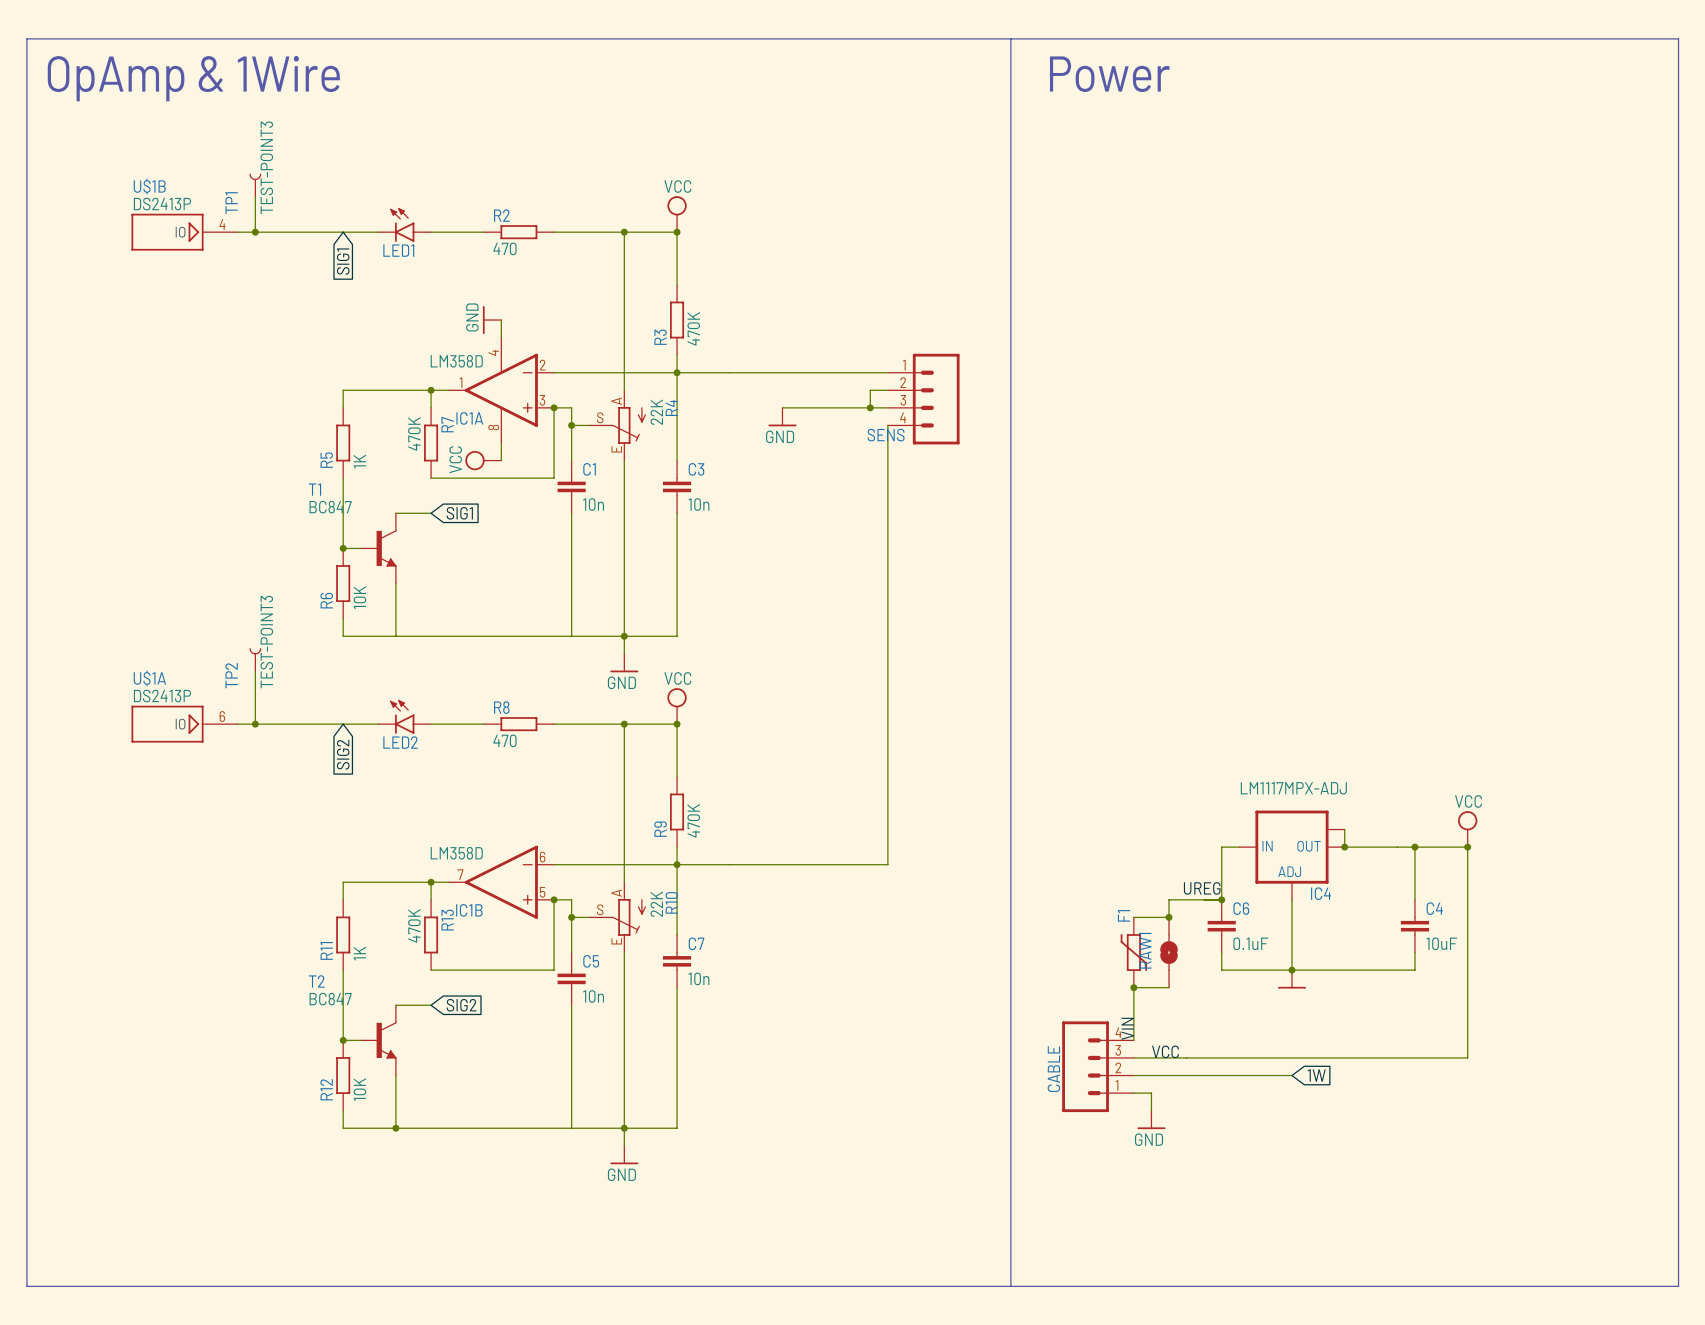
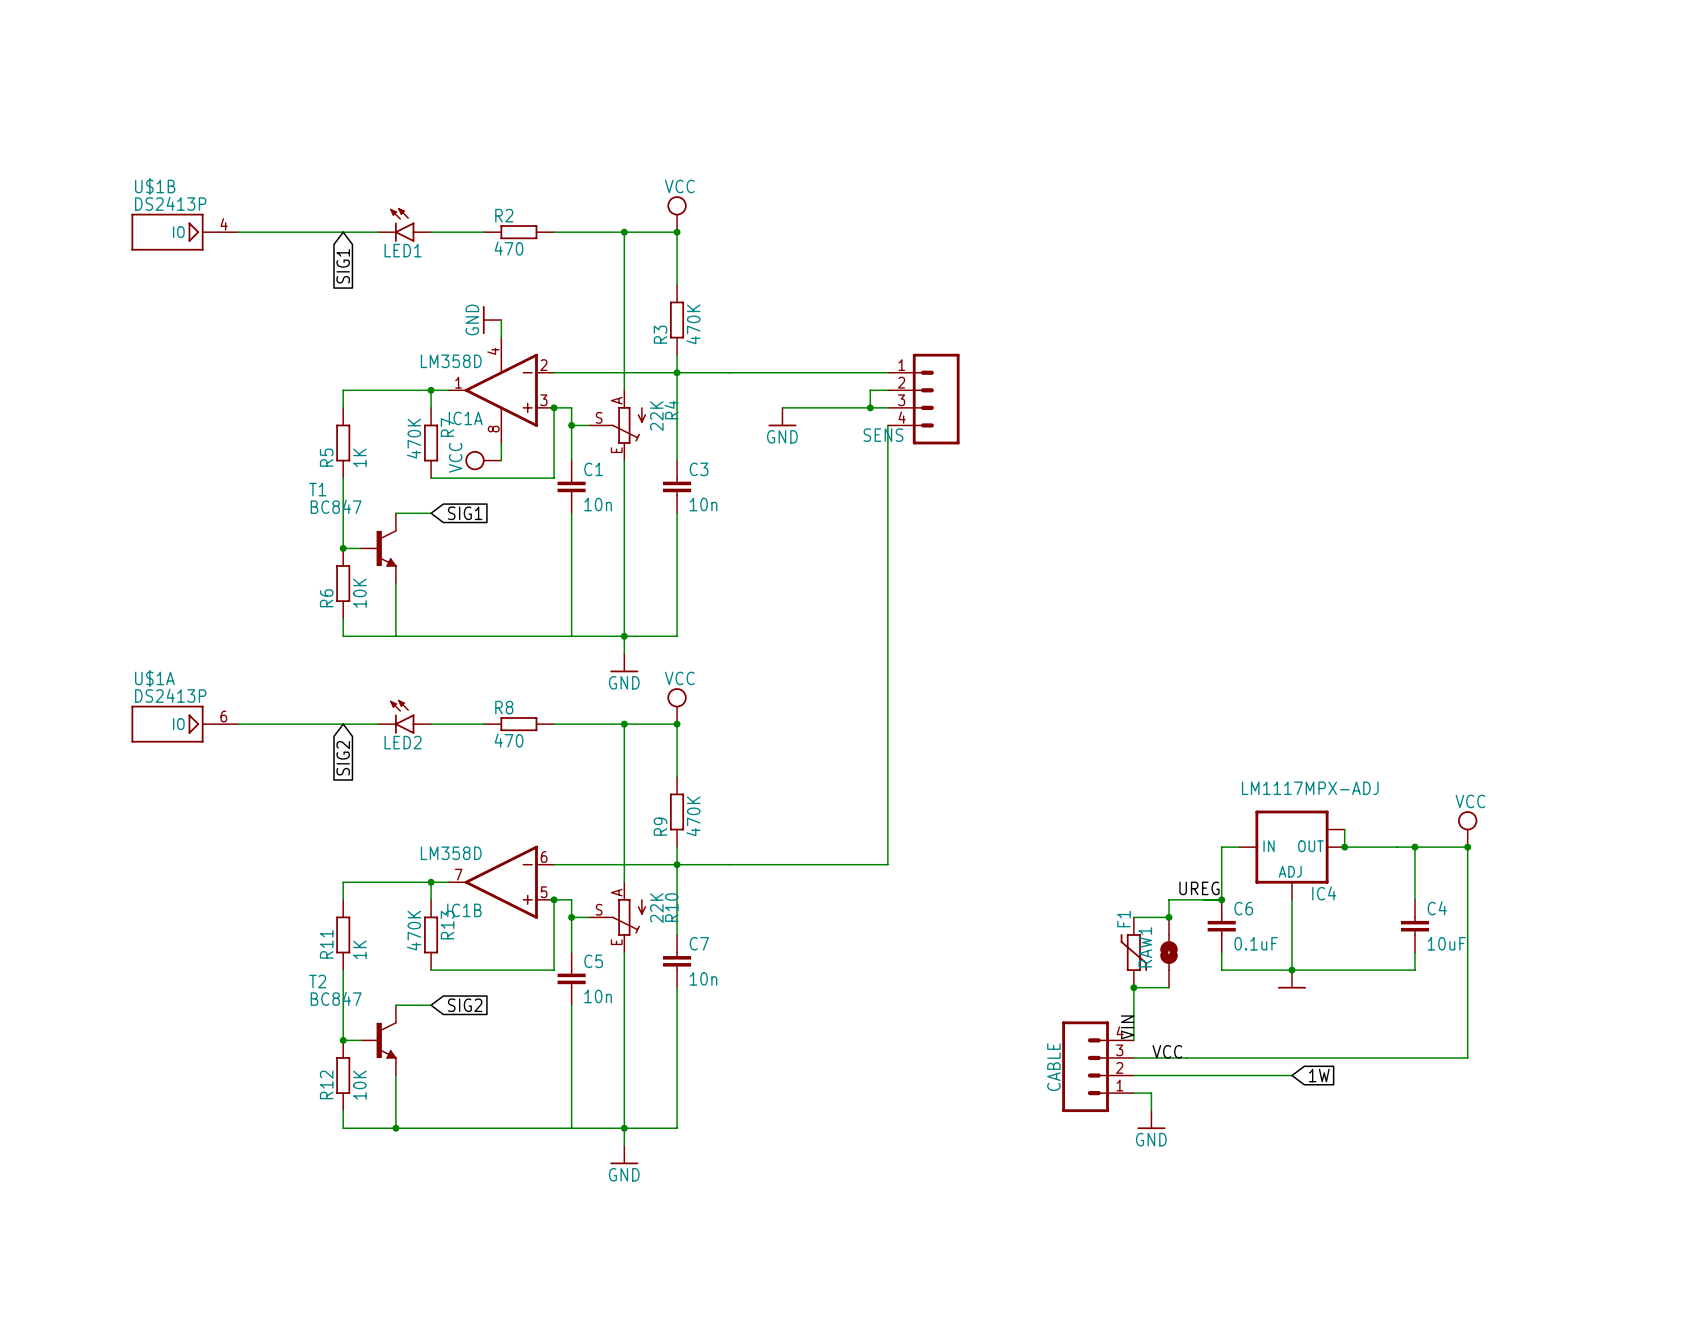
line: (26, 38) (1678, 38) (1678, 1286) (26, 1286) (26, 38) -> none
line: (1010, 38) (1010, 1286) -> none
text: Power (1109, 74) -> none
text: OpAmp & 1Wire (193, 78) -> none
TP1: TEST-POINT3 (255, 185) -> none
wire: (255, 197) (255, 232) -> none
junction: (255, 232) -> none
TP2: TEST-POINT3 (255, 660) -> none
wire: (255, 671) (255, 724) -> none
junction: (255, 724) -> none

